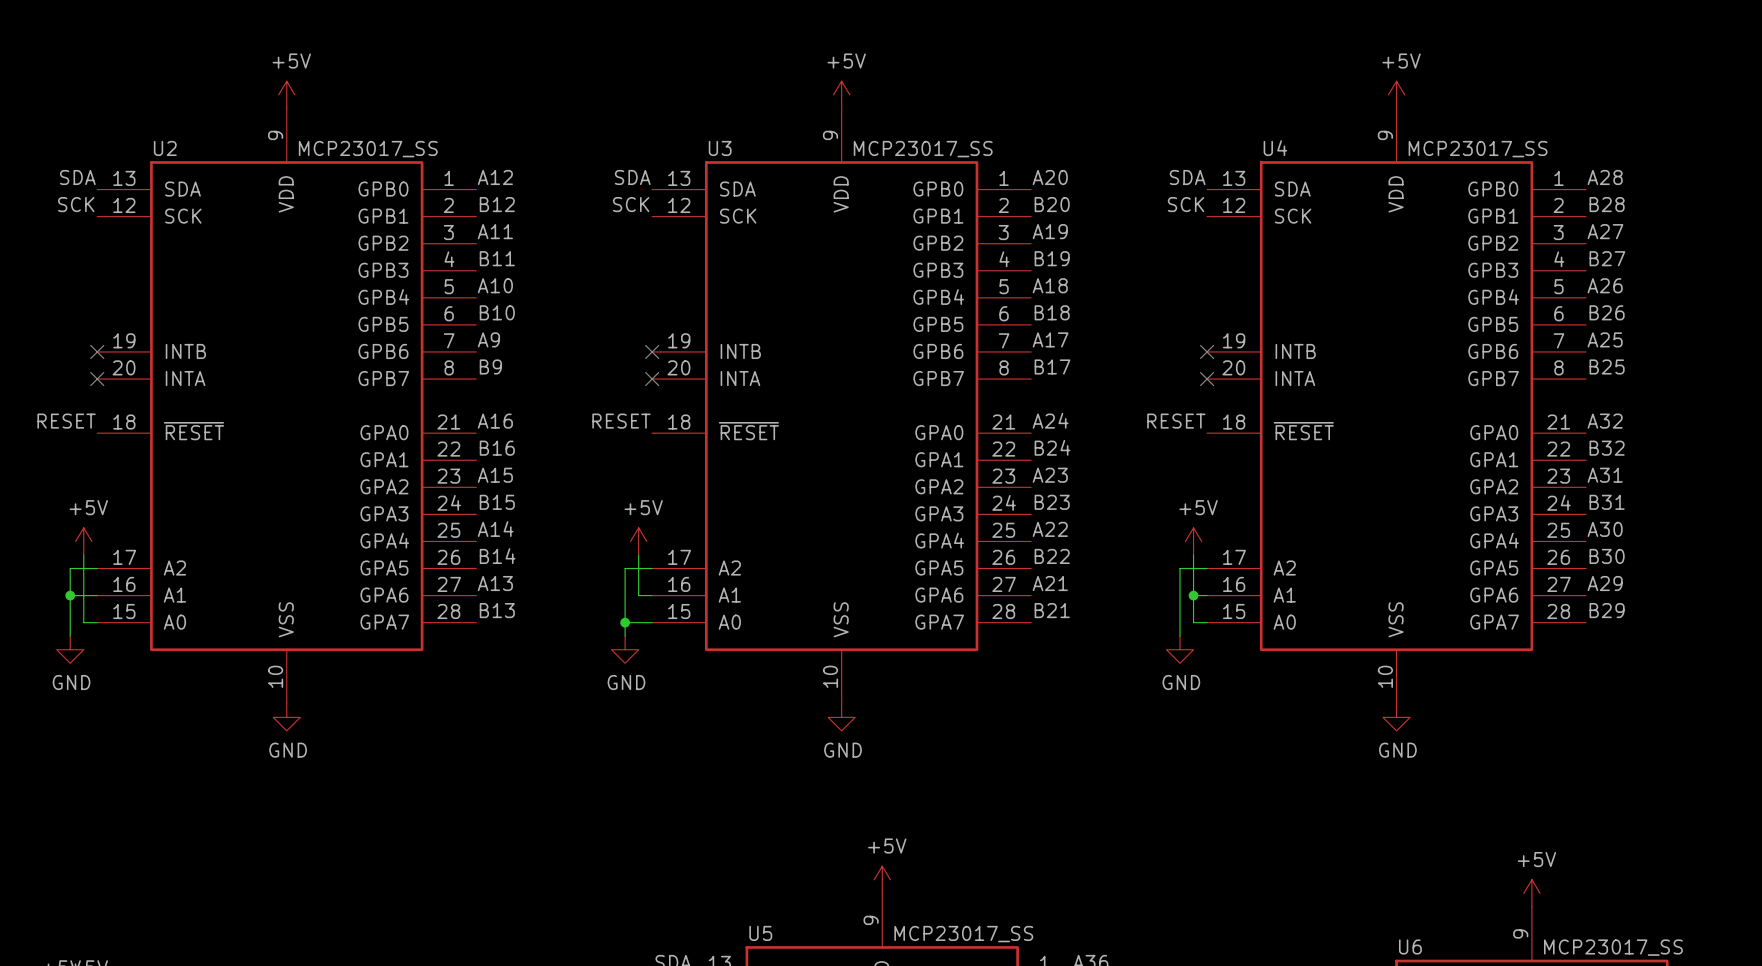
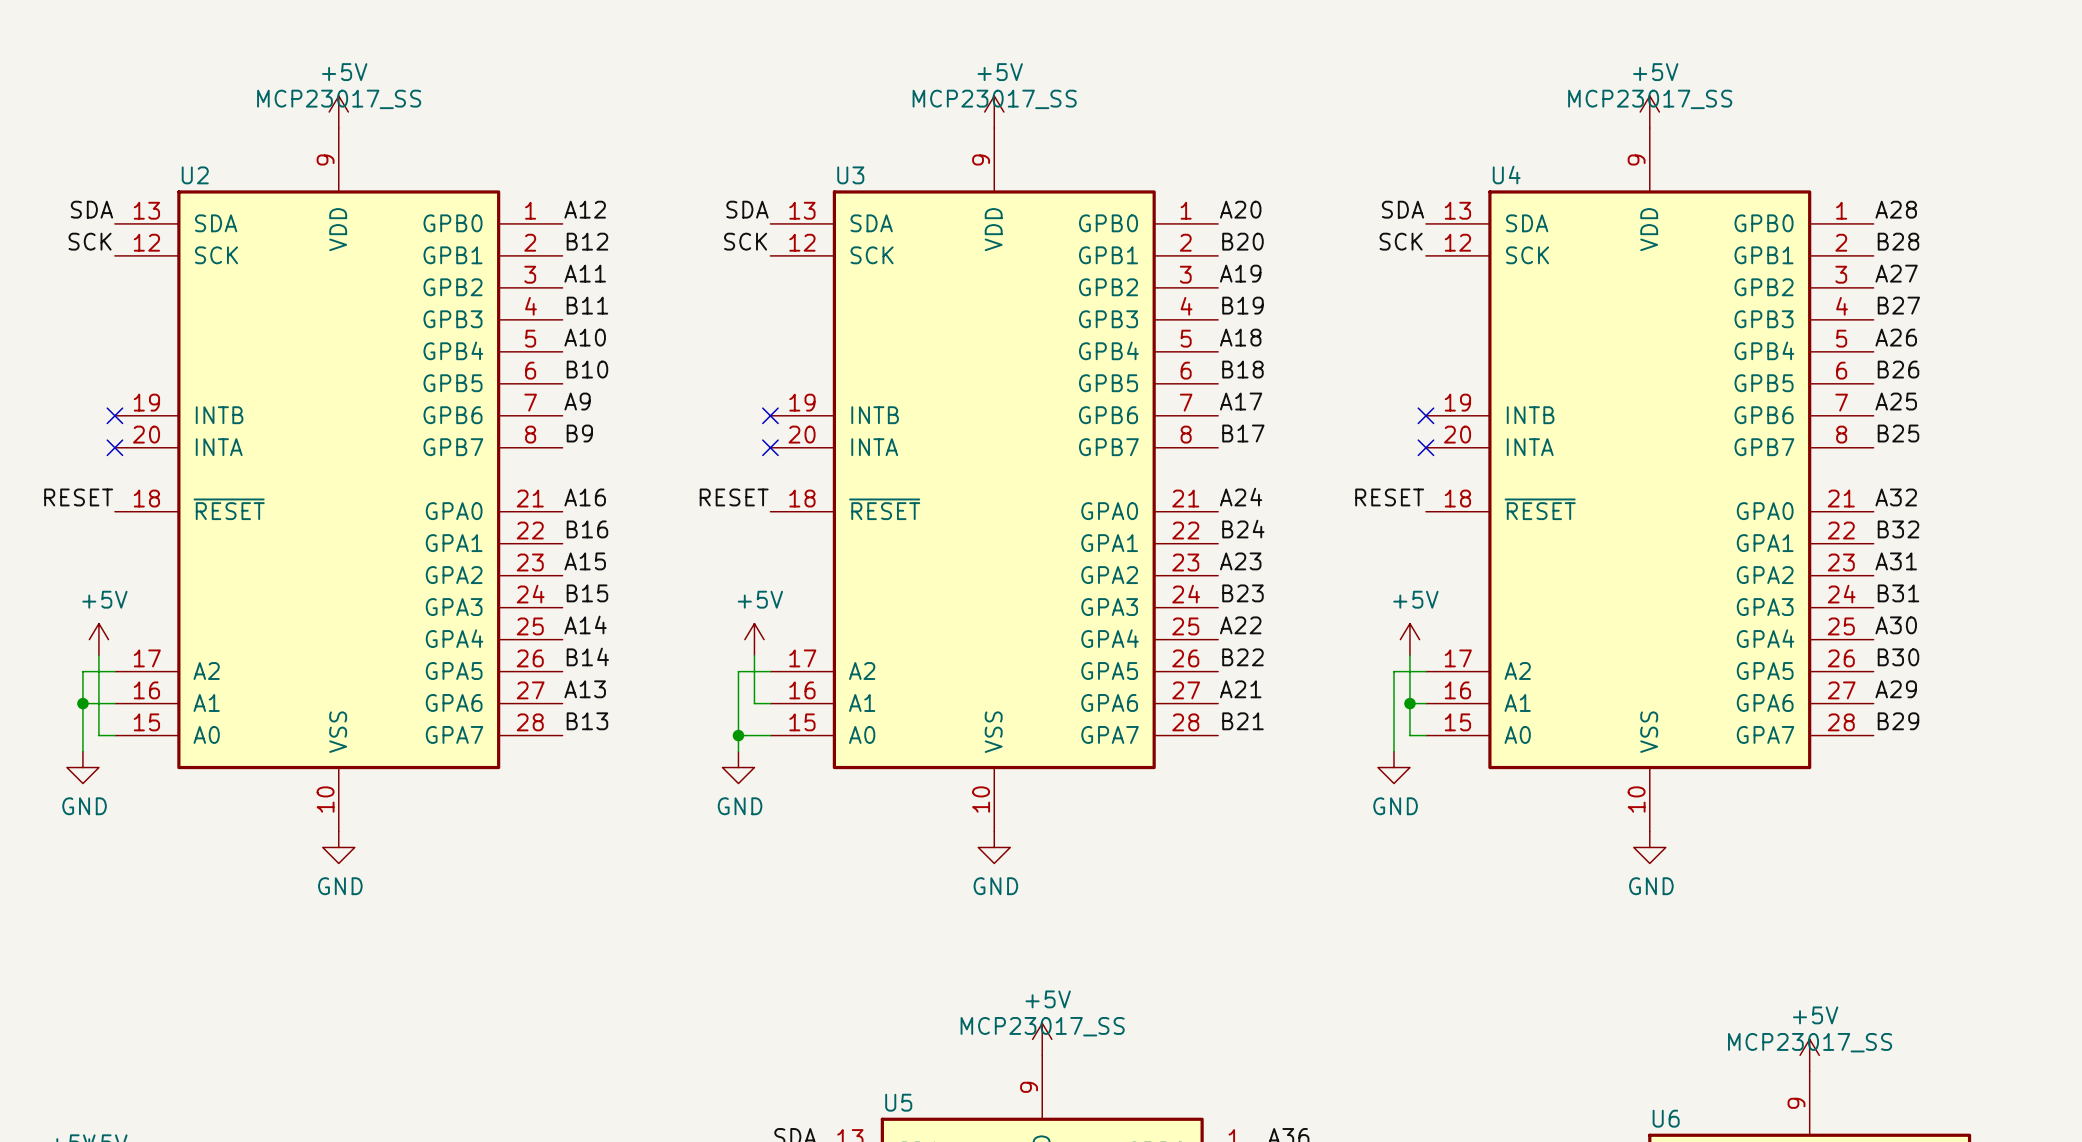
U2 value position: MCP23017_SS (368, 149) -> MCP23017_SS (339, 99)
U3 value position: MCP23017_SS (923, 149) -> MCP23017_SS (994, 99)
U4 value position: MCP23017_SS (1478, 149) -> MCP23017_SS (1650, 99)
U5 value position: MCP23017_SS (963, 934) -> MCP23017_SS (1042, 1026)
U6 value position: MCP23017_SS (1613, 947) -> MCP23017_SS (1810, 1042)

